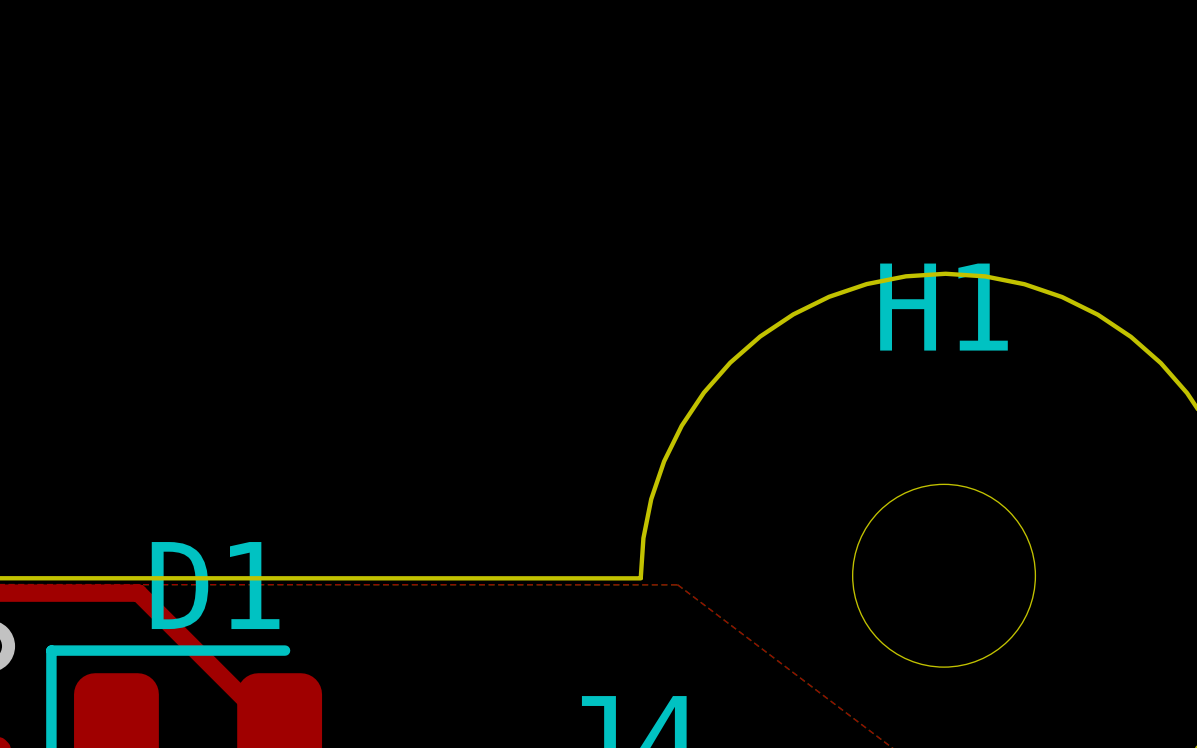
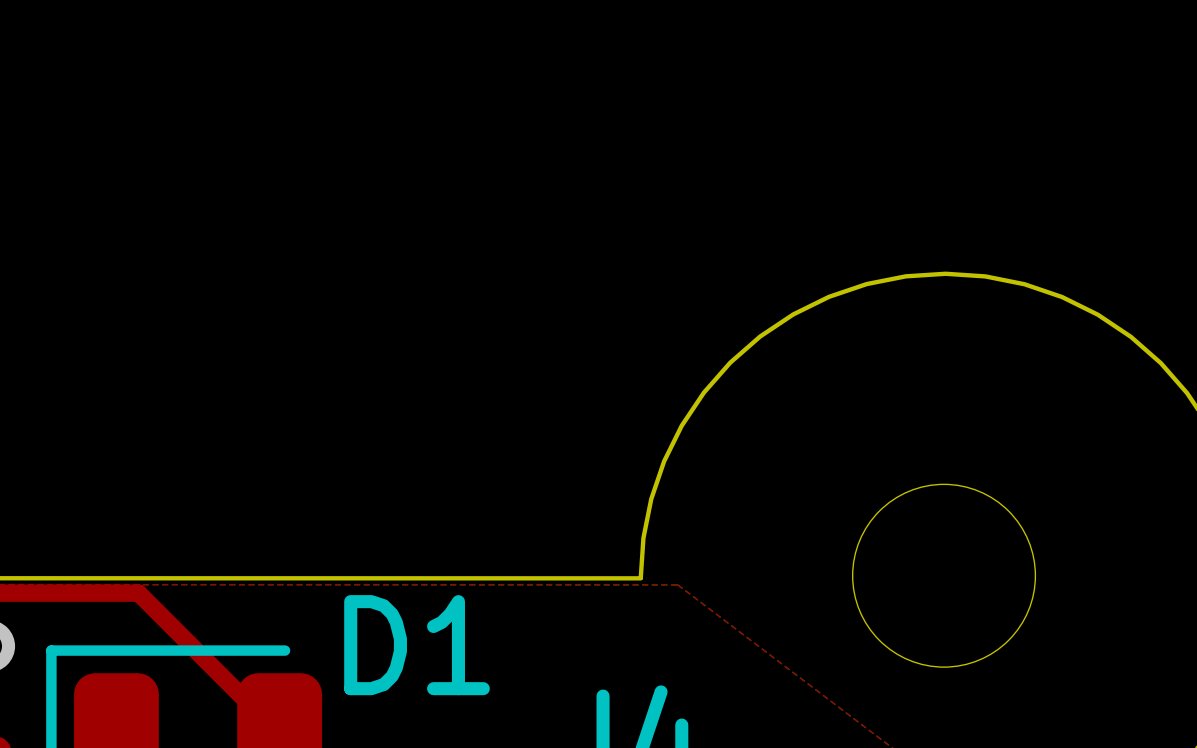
H1 name: H1 (943, 307) -> none
D1 name position: D1 (215, 585) -> D1 (417, 645)

